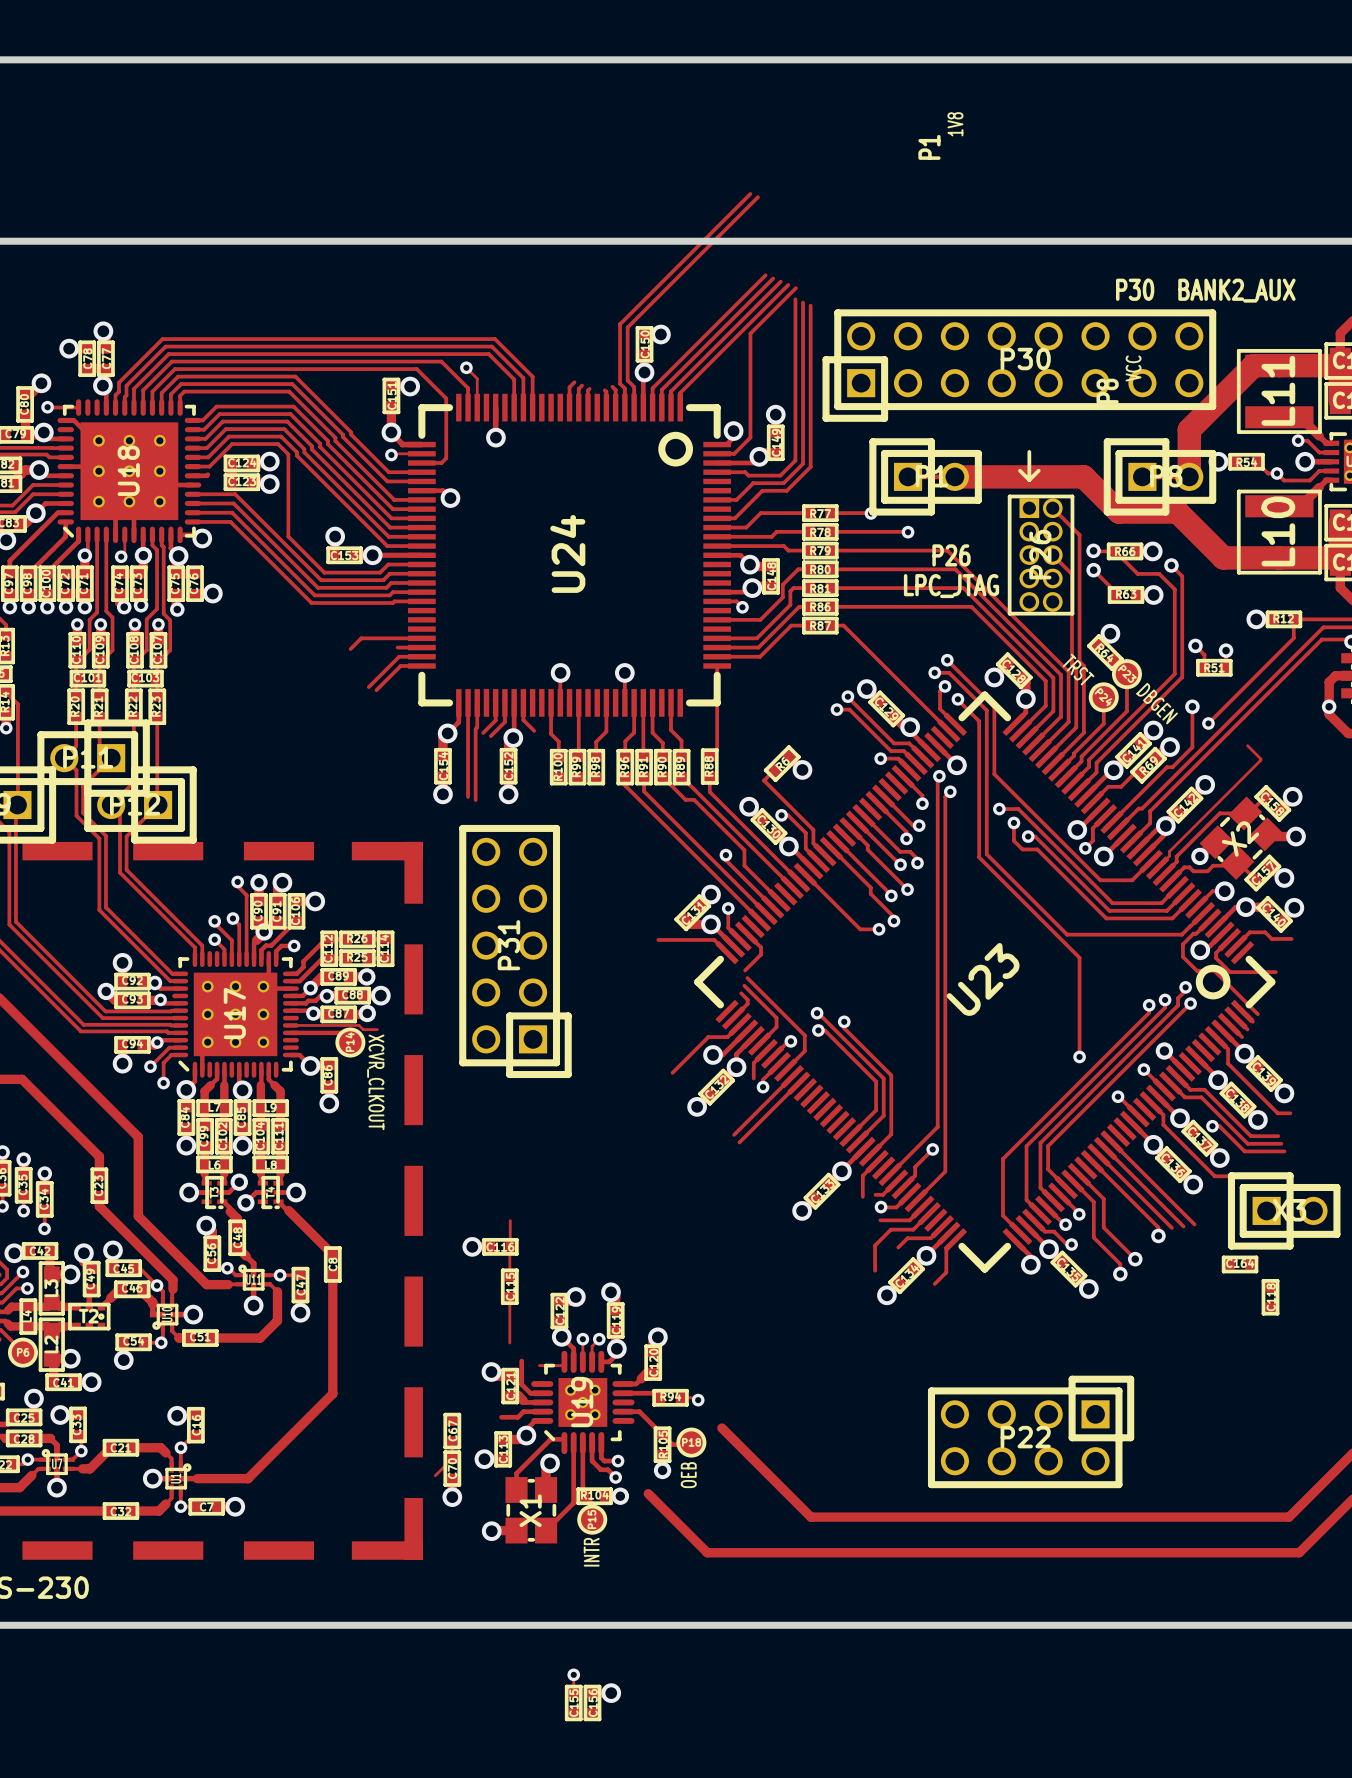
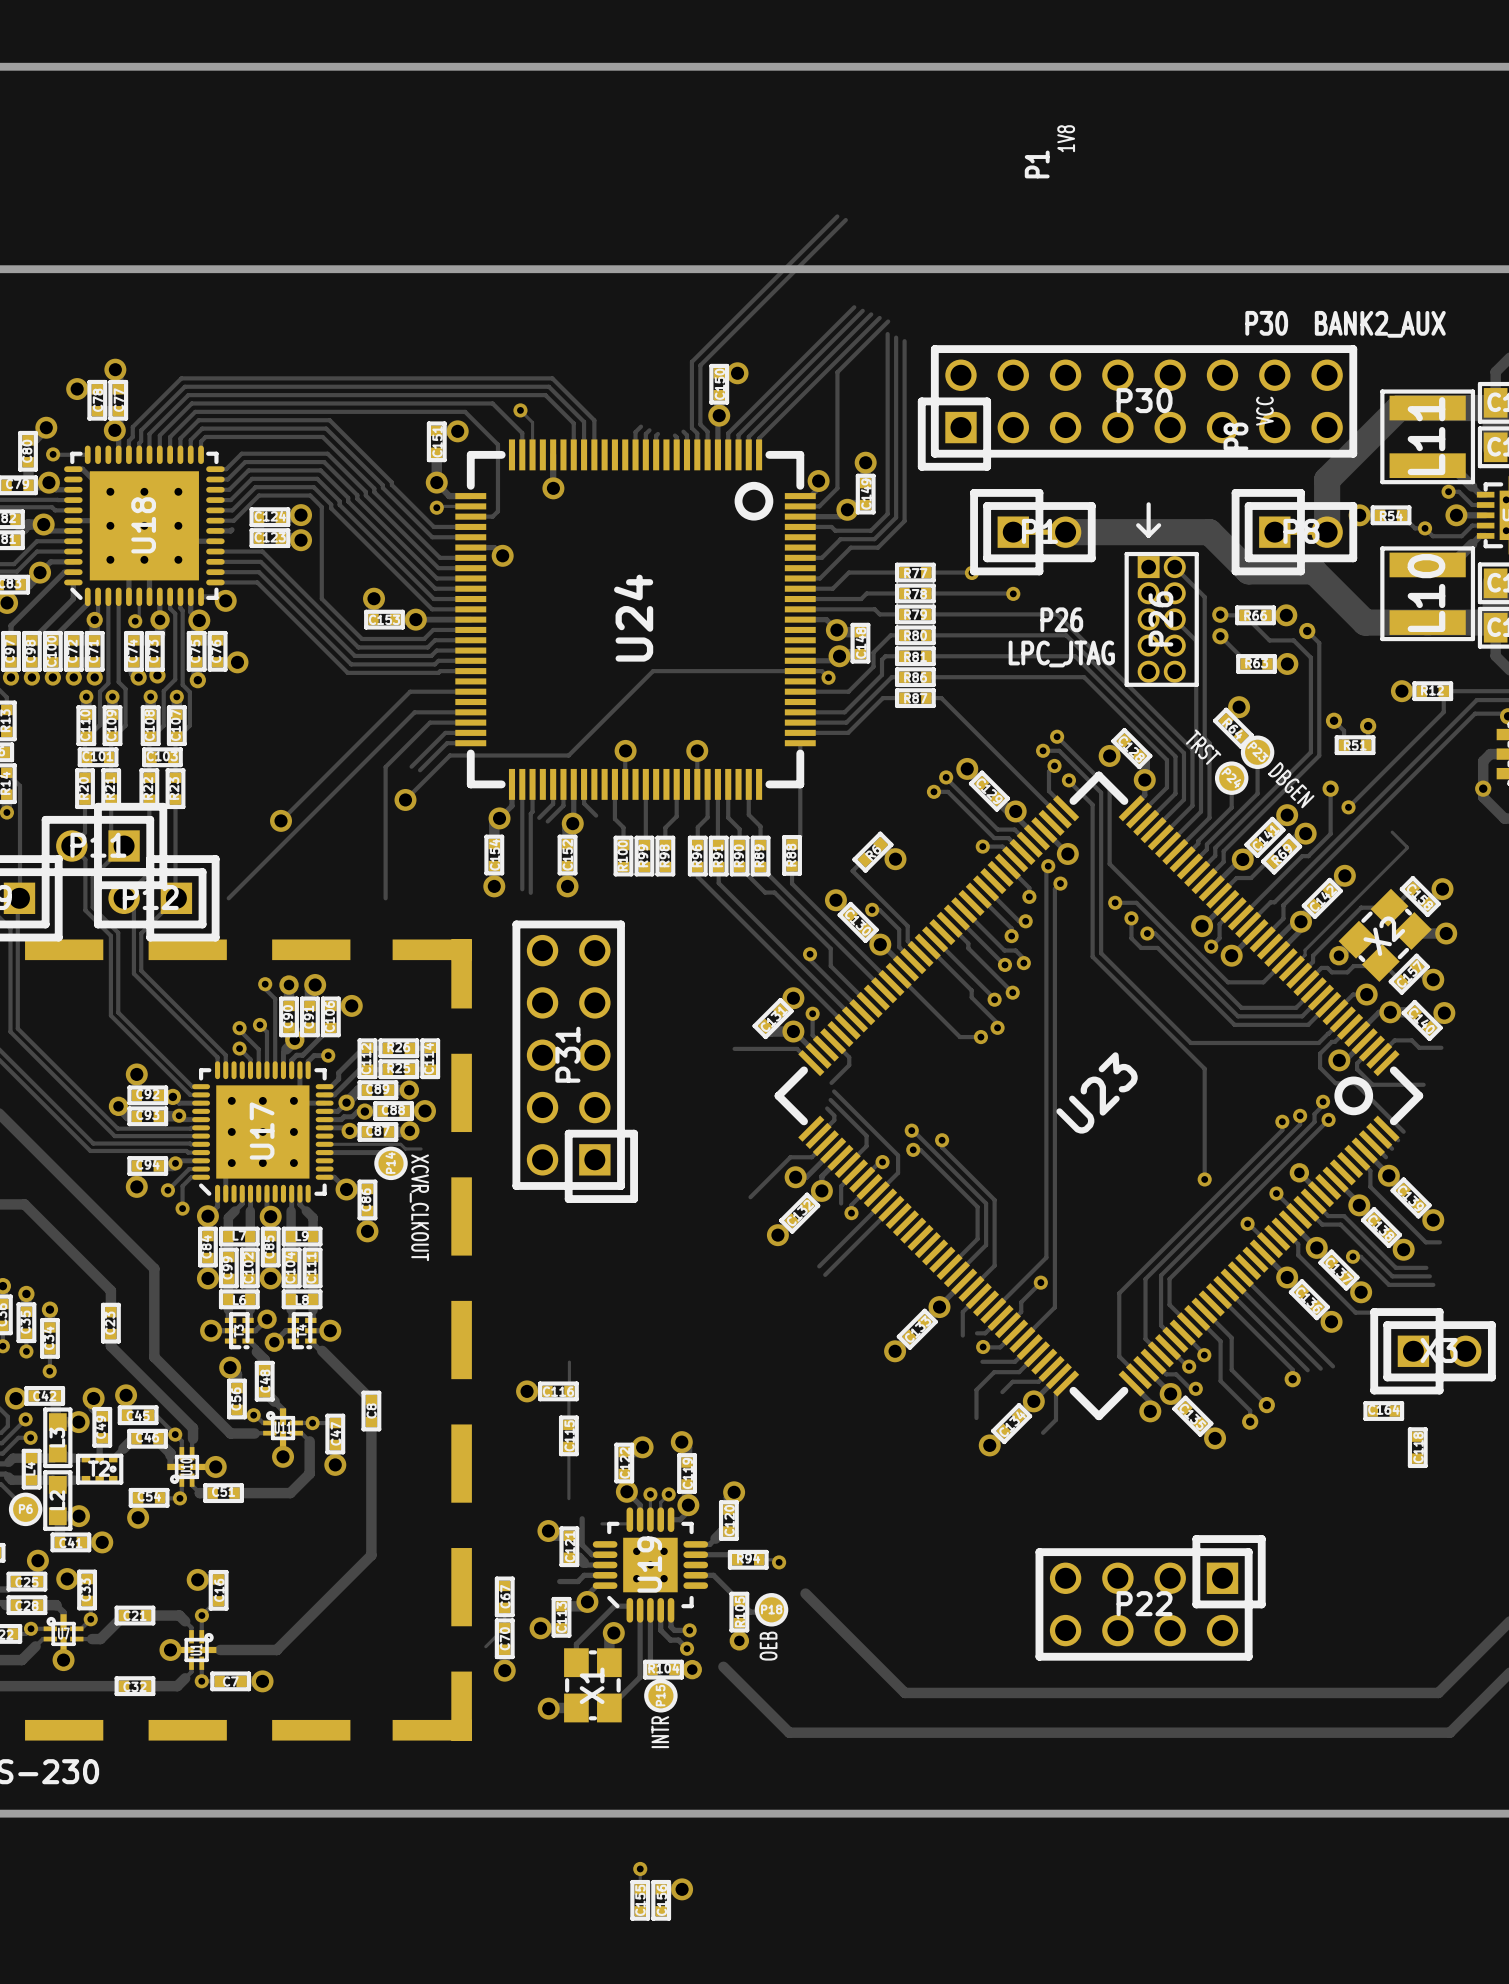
track: none -> (800, 671) (653, 671) (568, 755) (449, 755) (405, 799)
track: none -> (470, 691) (410, 691) (281, 820)
track: (371, 638) (361, 638) (350, 649) -> (414, 712) (228, 898)
track: none -> (443, 722) (430, 722) (385, 767) (385, 898)
via: none -> (405, 799)
via: none -> (281, 820)

